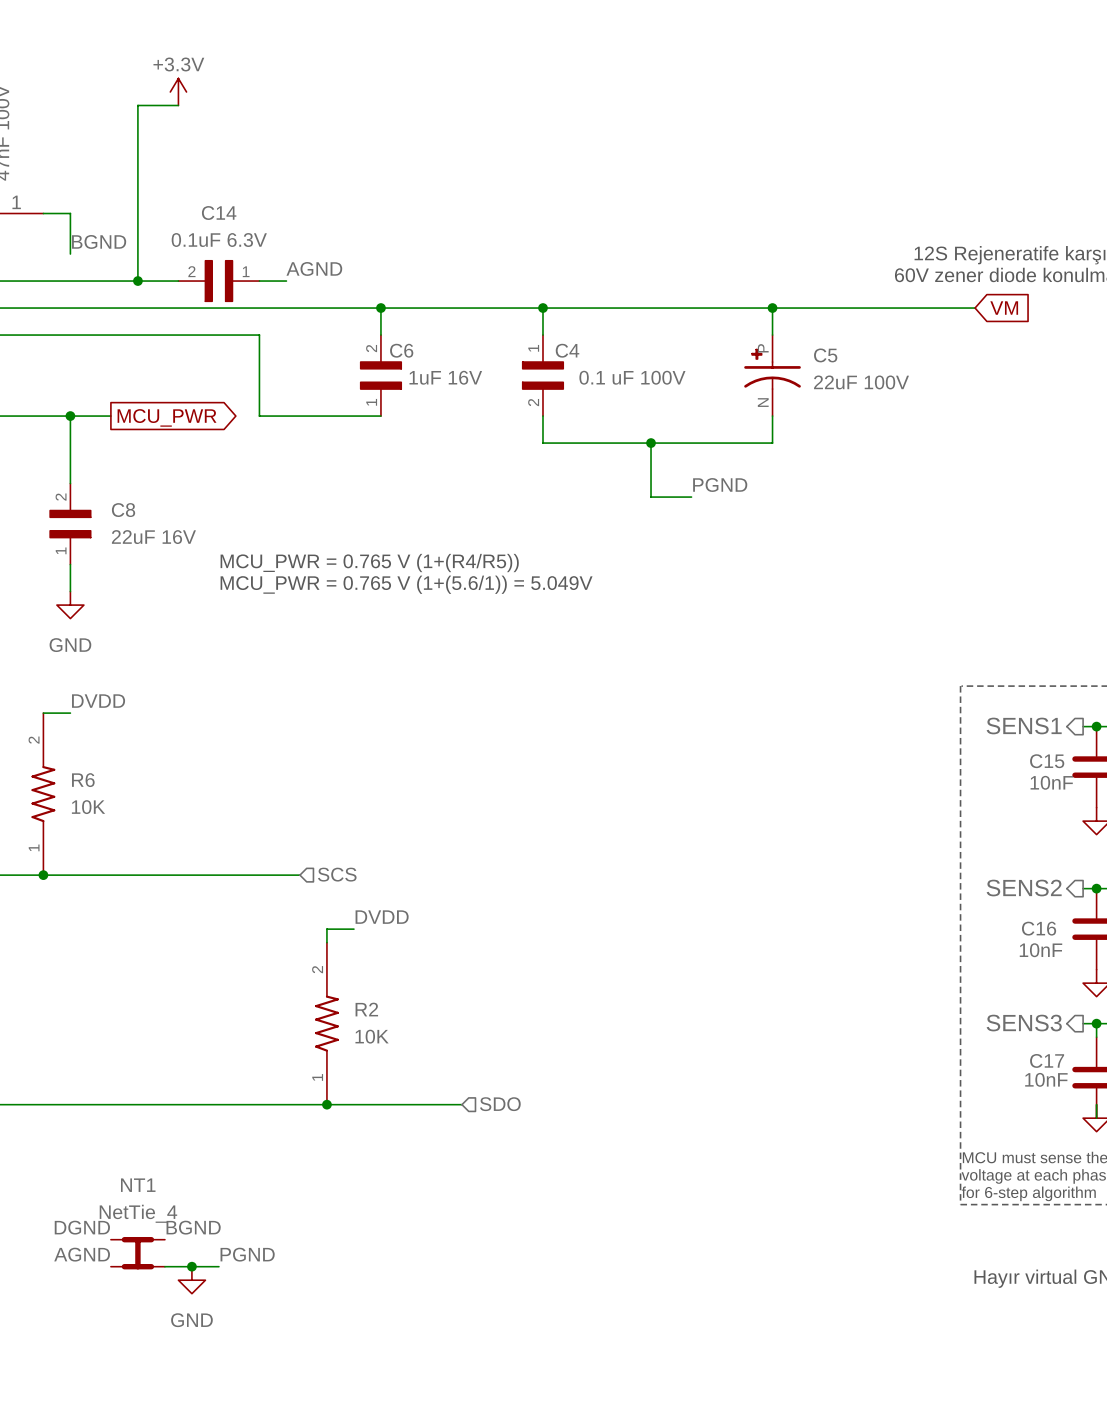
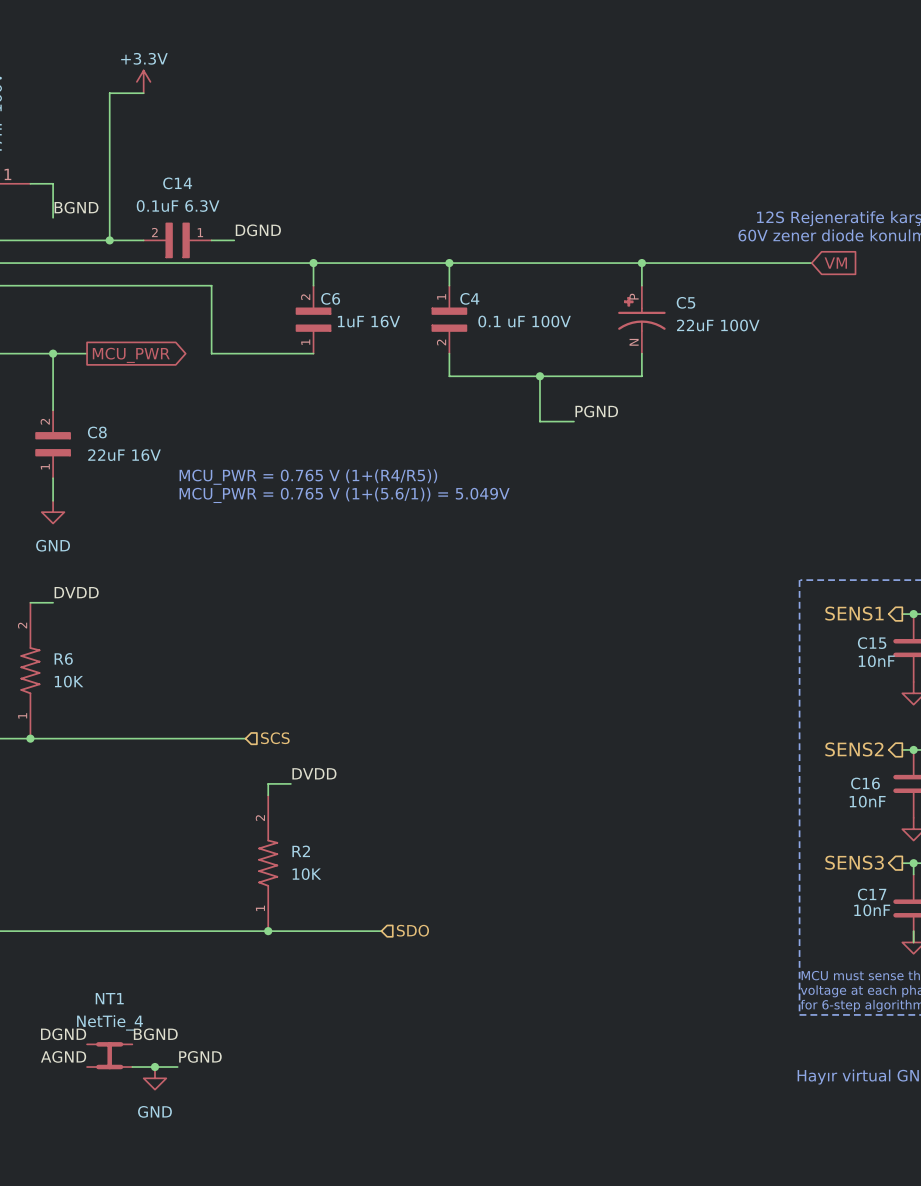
label: AGND (314, 268) -> DGND (258, 230)

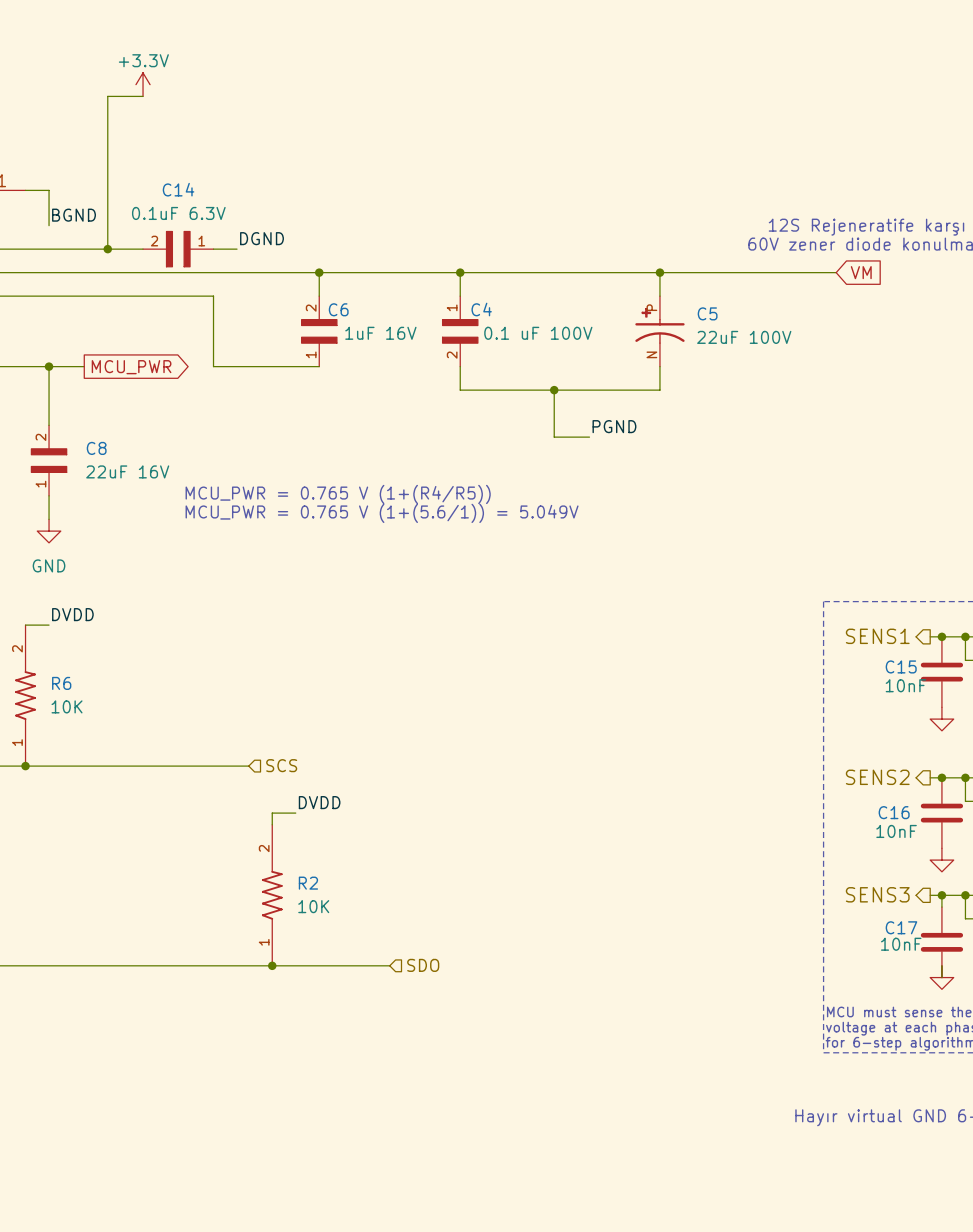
label: DGND (63, 1034) -> none
label: BGND (155, 1034) -> none
NT1: NetTie_4 (109, 1055) -> none
label: AGND (63, 1056) -> none
label: PGND (200, 1056) -> none
wire: (132, 1067) (177, 1067) -> none
junction: (154, 1067) -> none
power symbol: GND (154, 1078) -> none

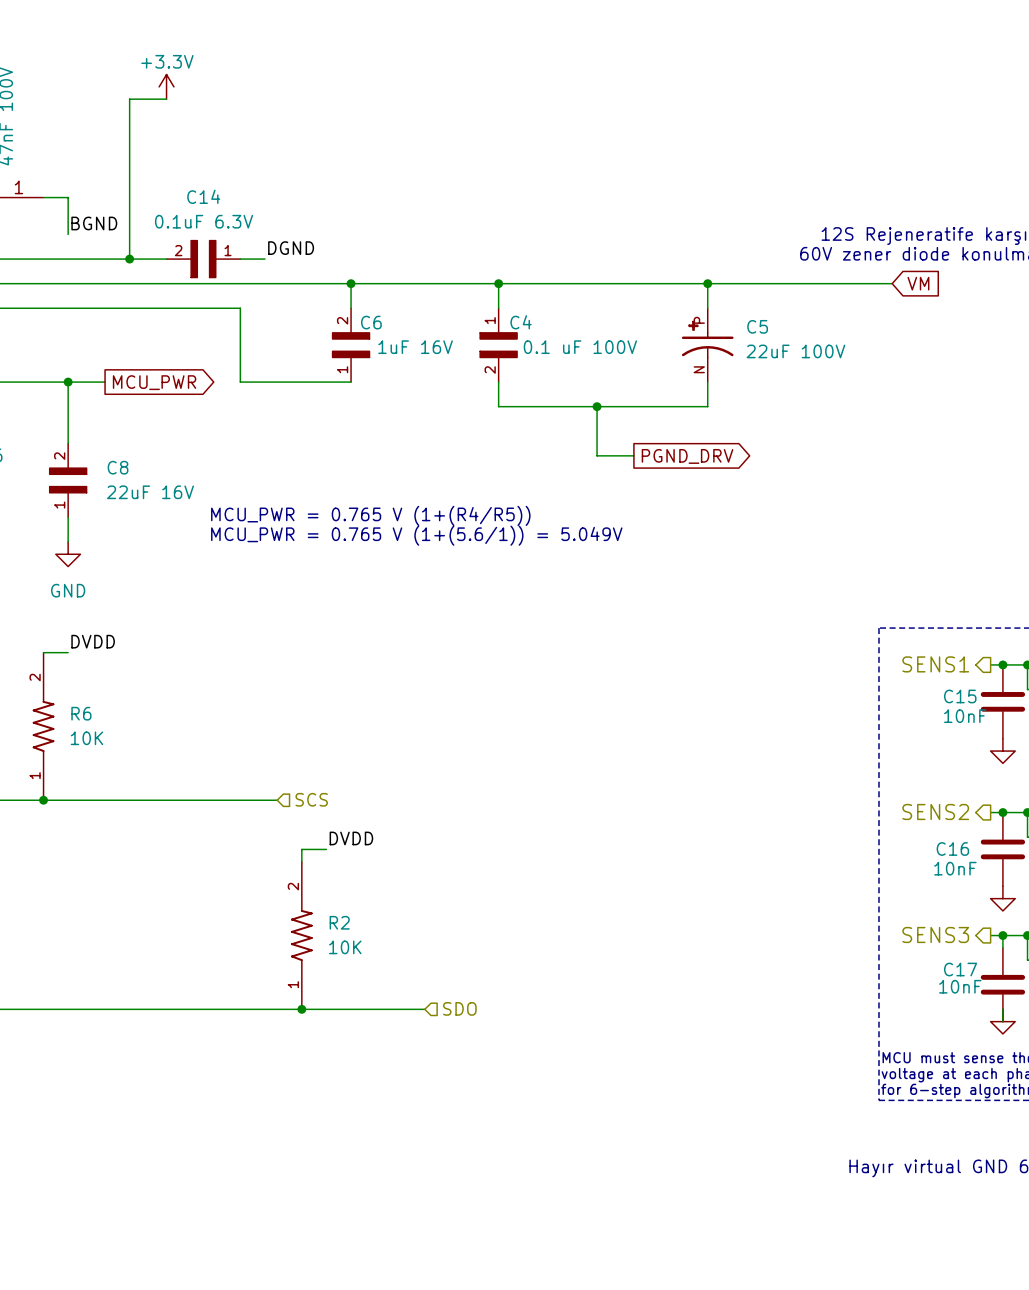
label: PGND (614, 426) -> none
global label: none -> PGND_DRV (687, 456)

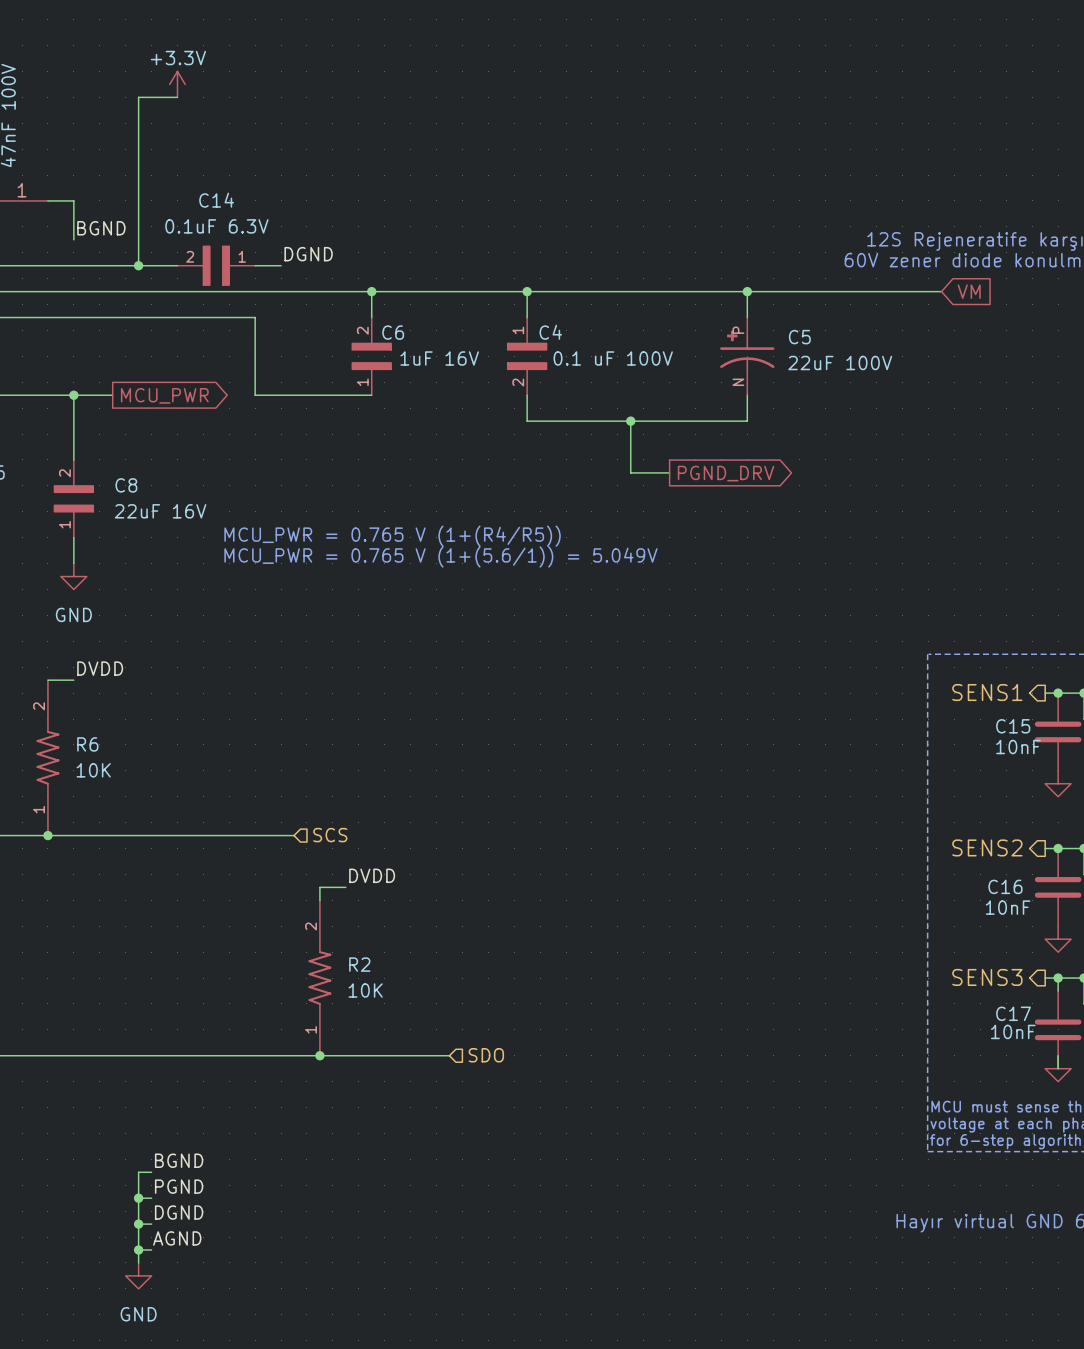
label: none -> BGND (179, 1160)
wire: none -> (151, 1172) (138, 1172) (138, 1262)
label: none -> PGND (179, 1186)
wire: none -> (138, 1198) (151, 1198)
junction: none -> (138, 1198)
label: none -> DGND (179, 1212)
wire: none -> (138, 1224) (151, 1224)
junction: none -> (138, 1224)
label: none -> AGND (177, 1238)
wire: none -> (138, 1250) (151, 1250)
junction: none -> (138, 1250)
power symbol: none -> GND (138, 1275)

